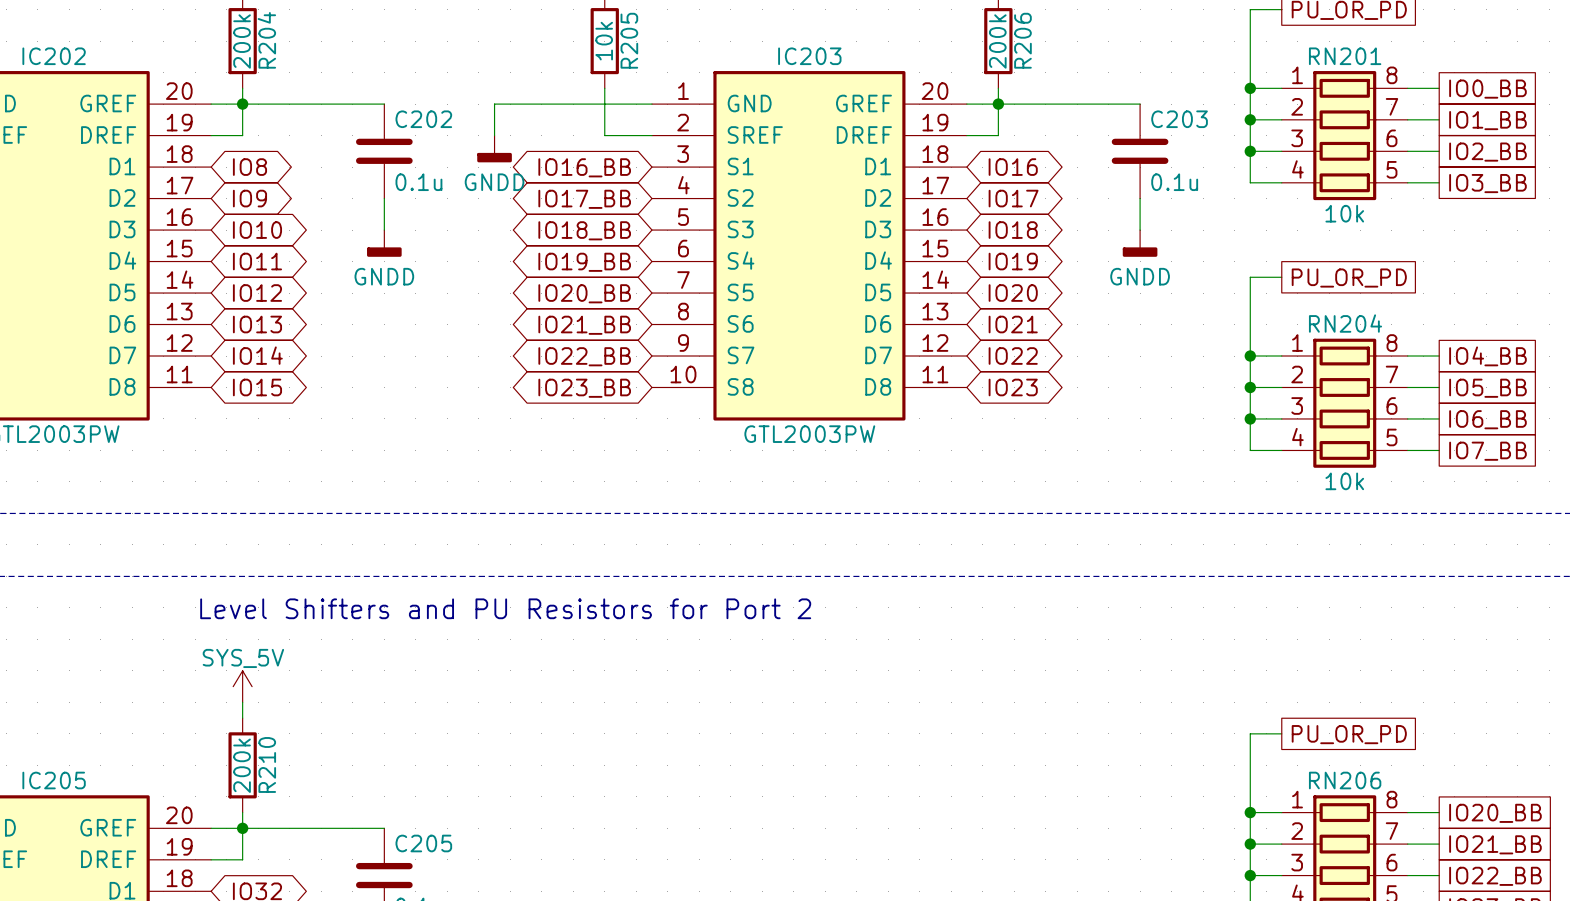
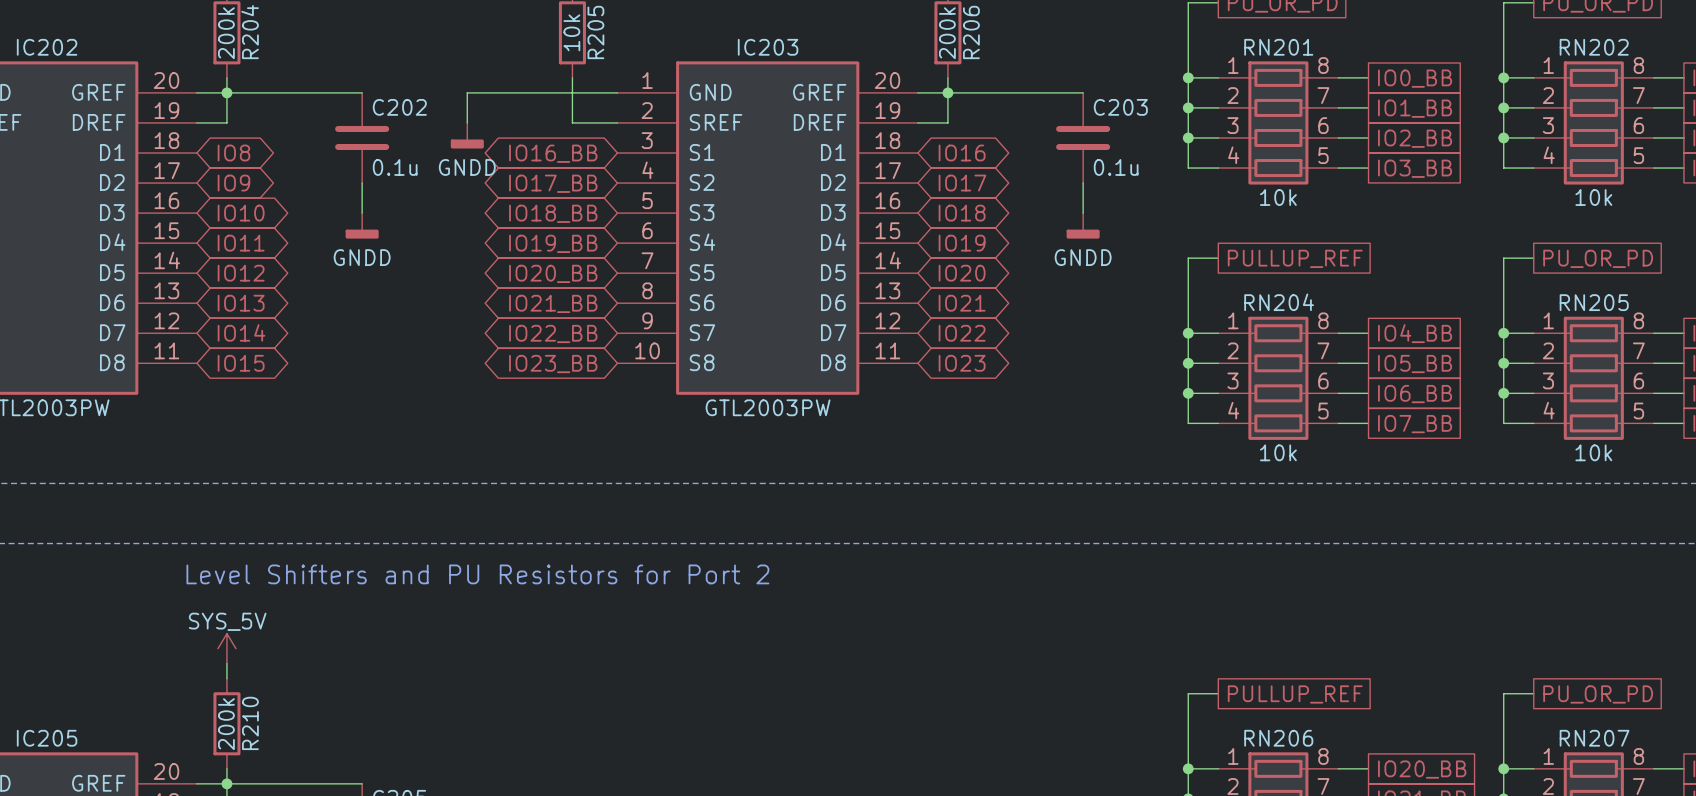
global label: PU_OR_PD (1349, 278) -> PULLUP_REF (1295, 258)
global label: PU_OR_PD (1349, 734) -> PULLUP_REF (1295, 694)

